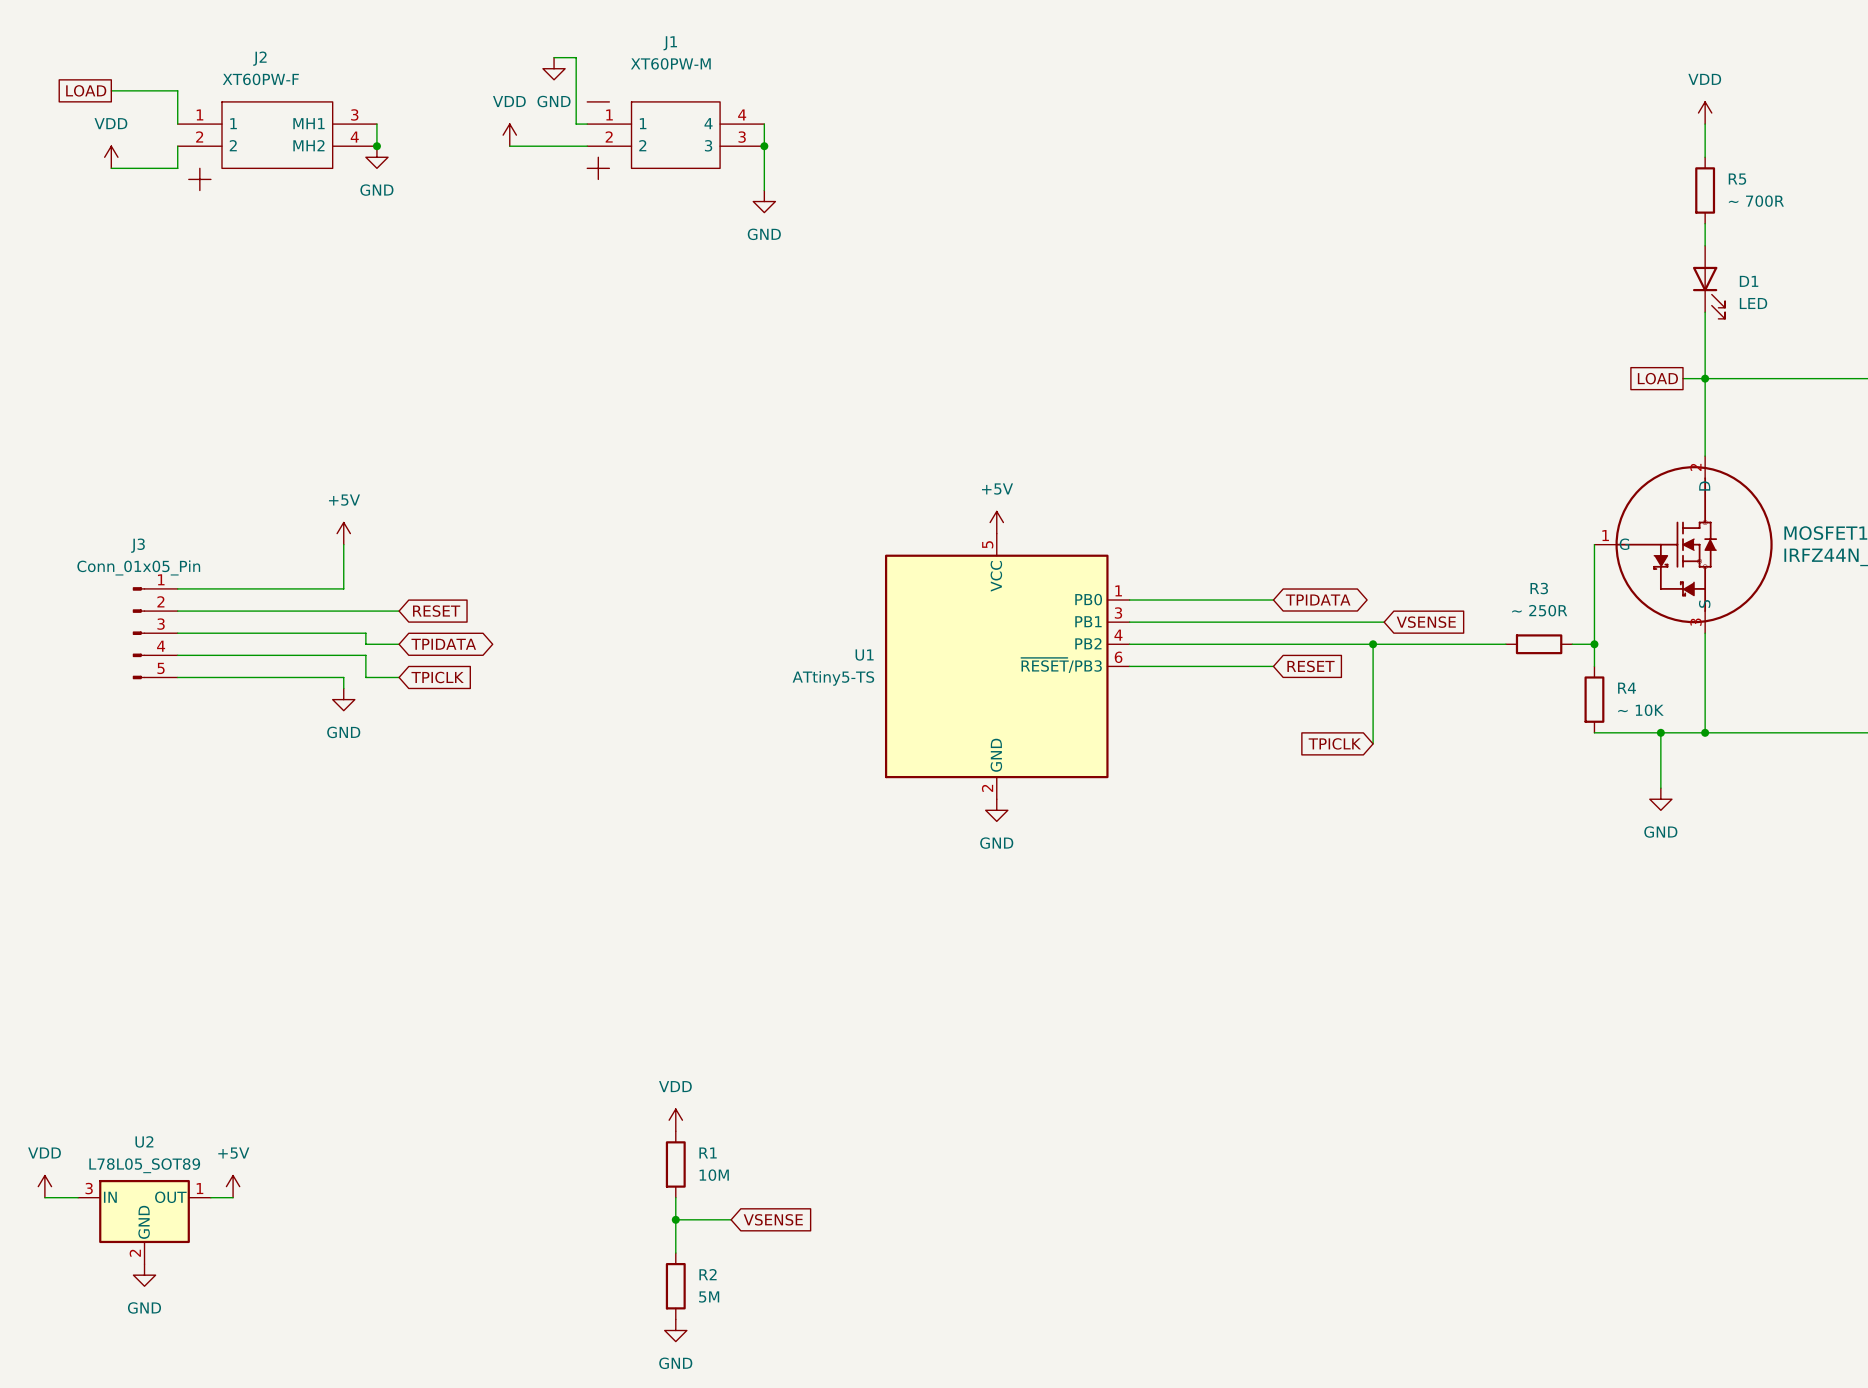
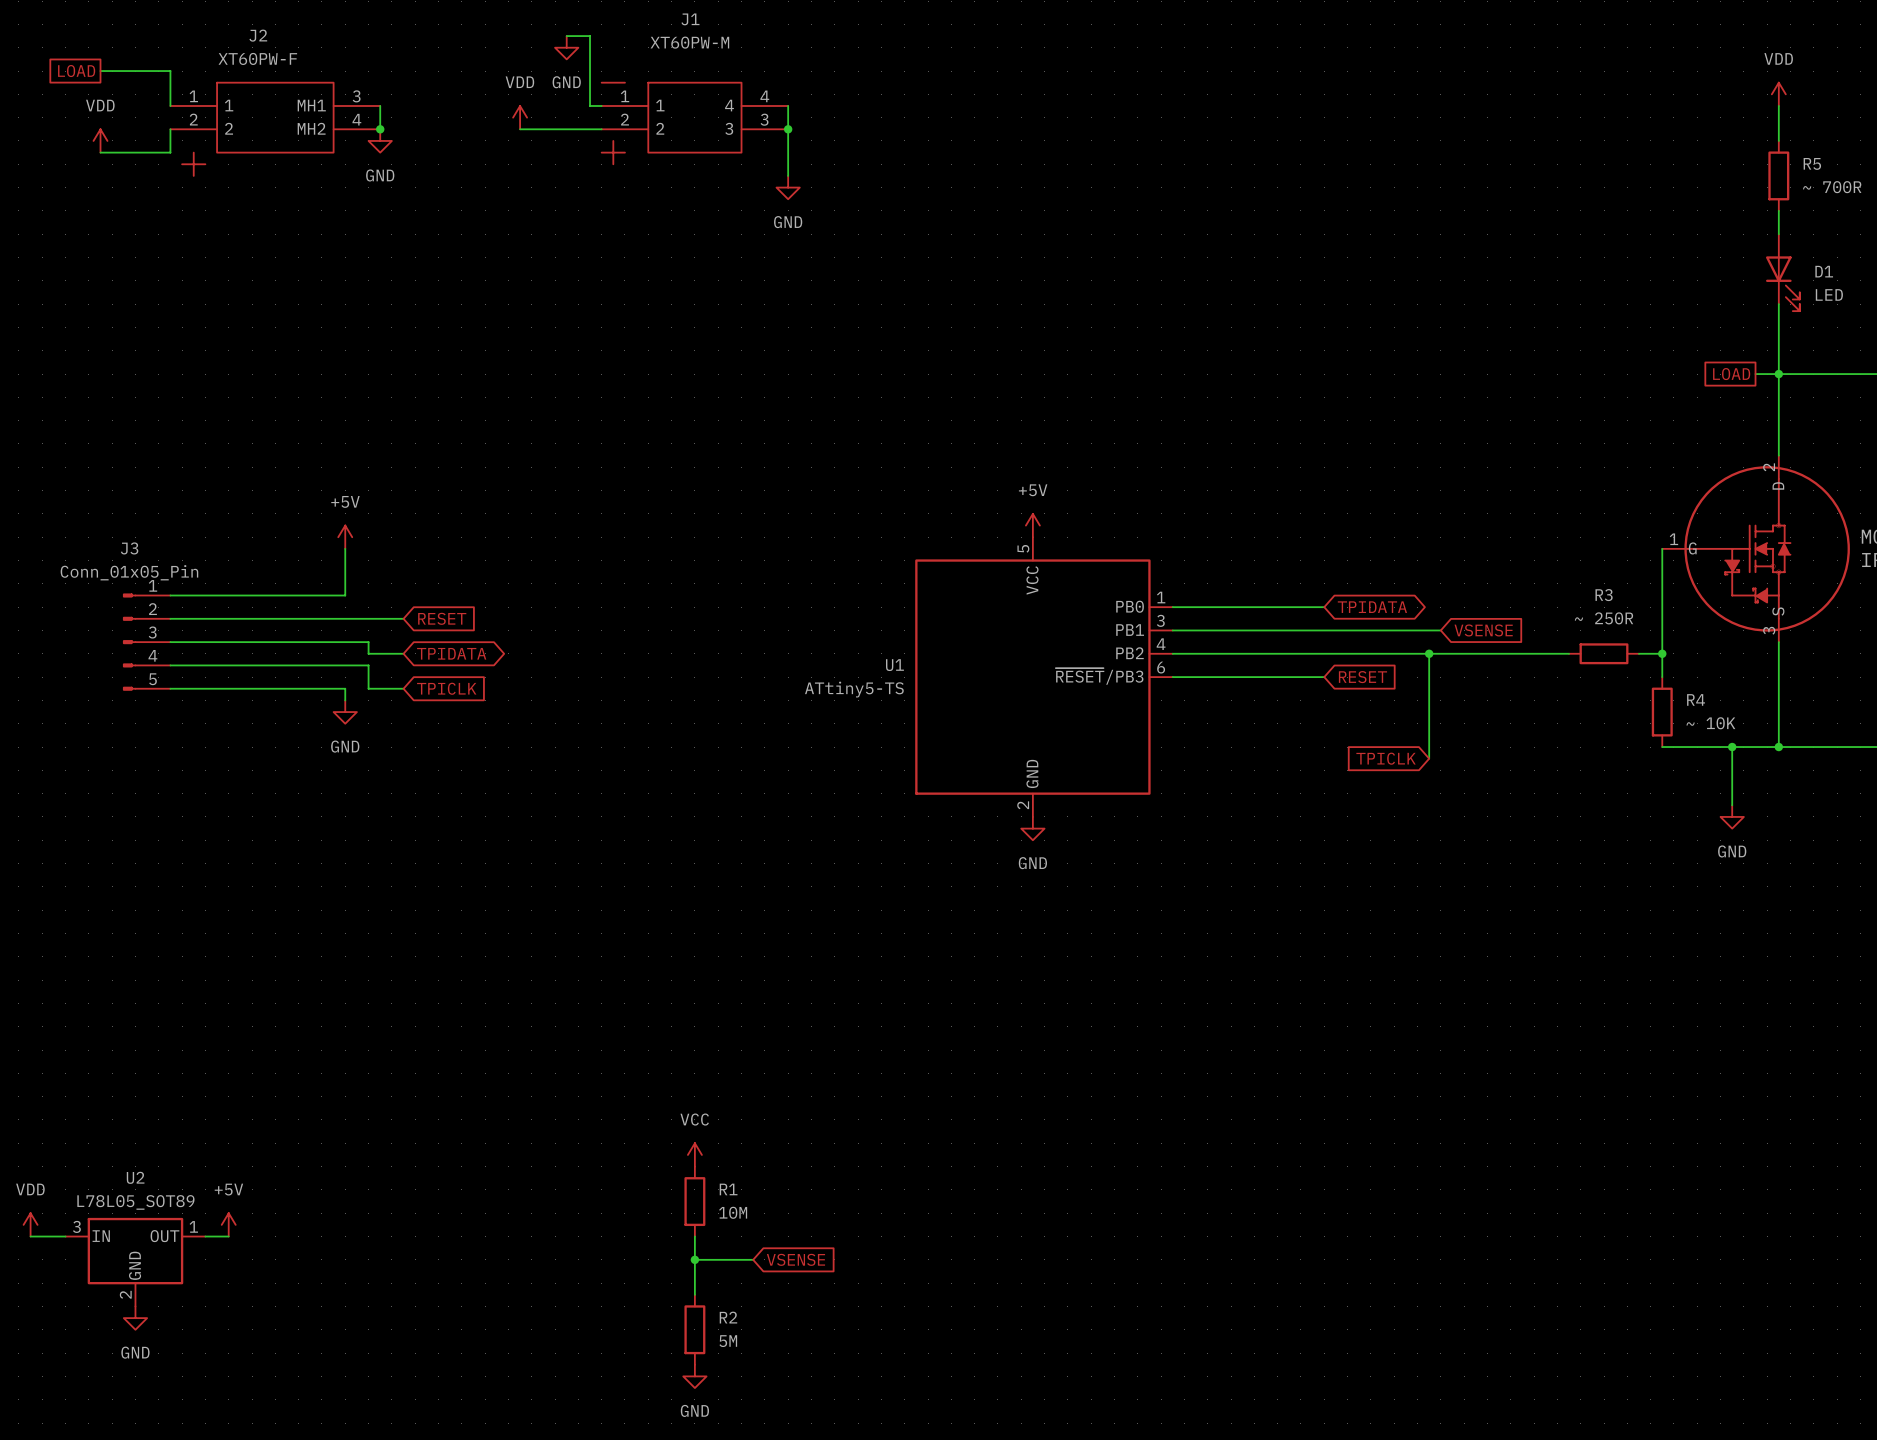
power symbol: VDD (675, 1120) -> VCC (694, 1154)

